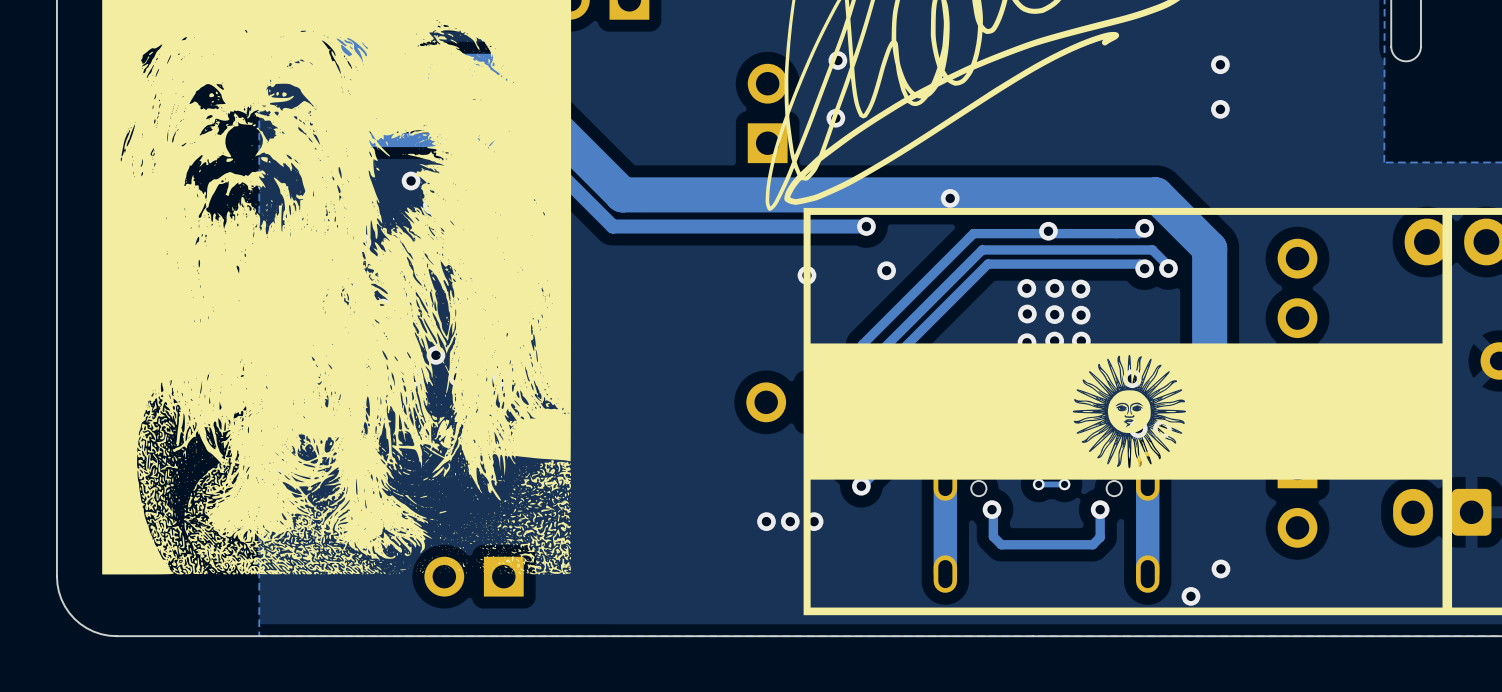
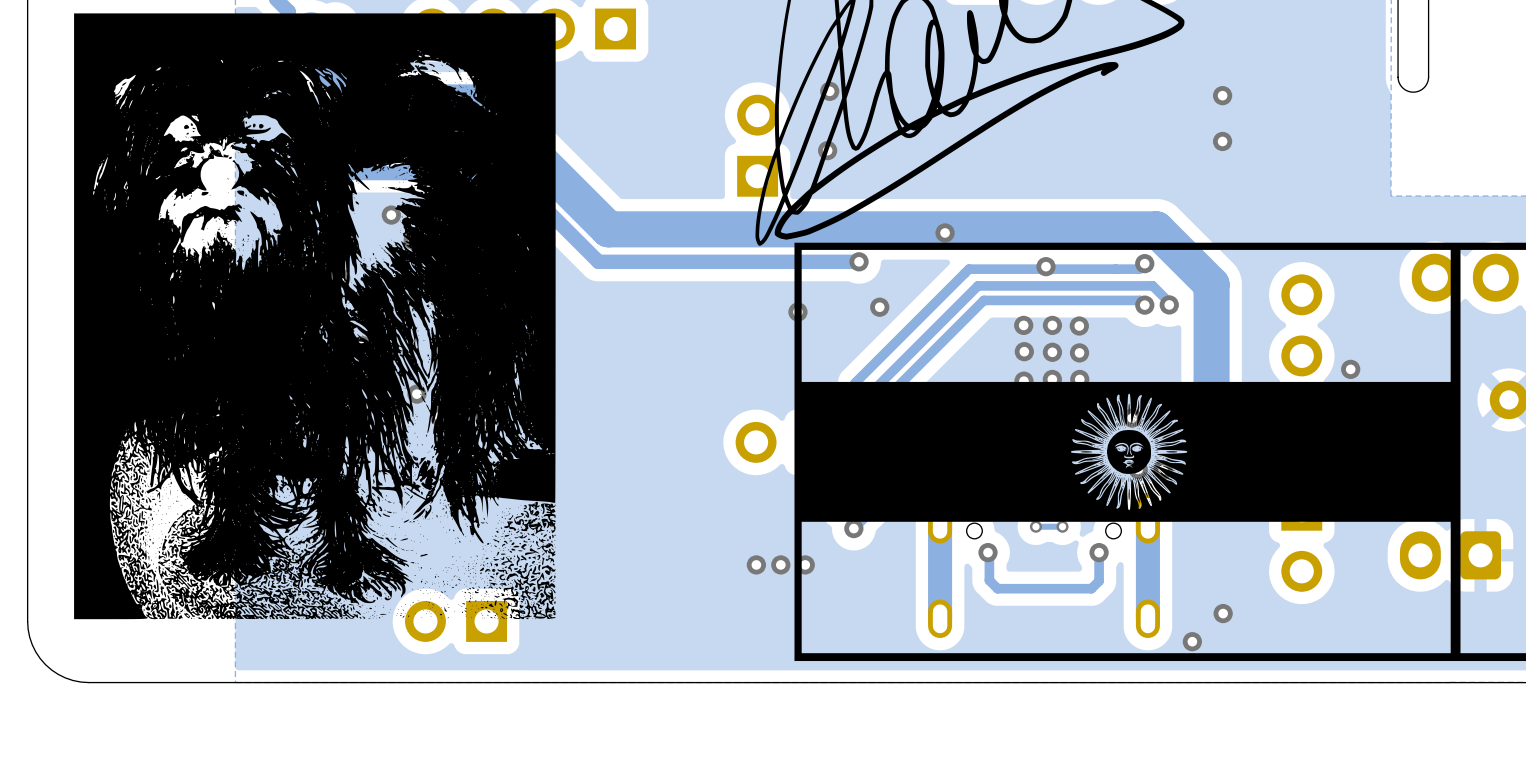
via: none -> (1350, 369)

